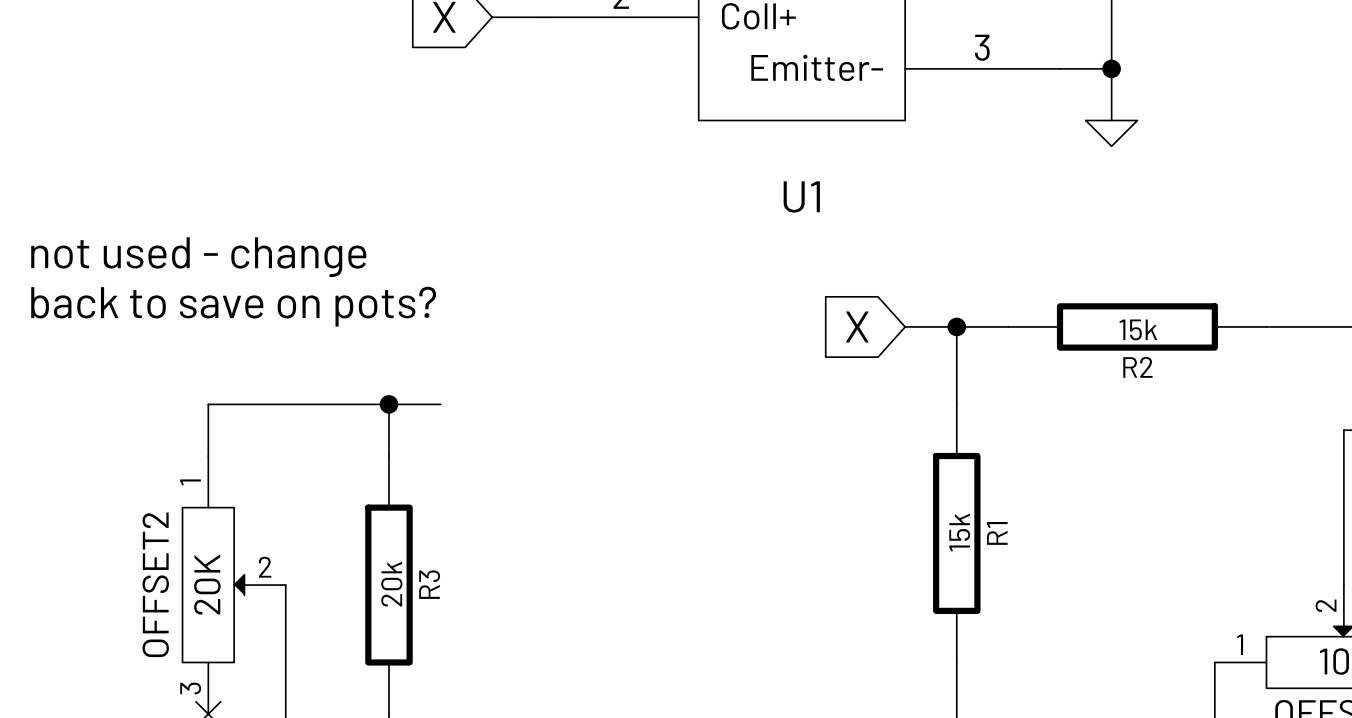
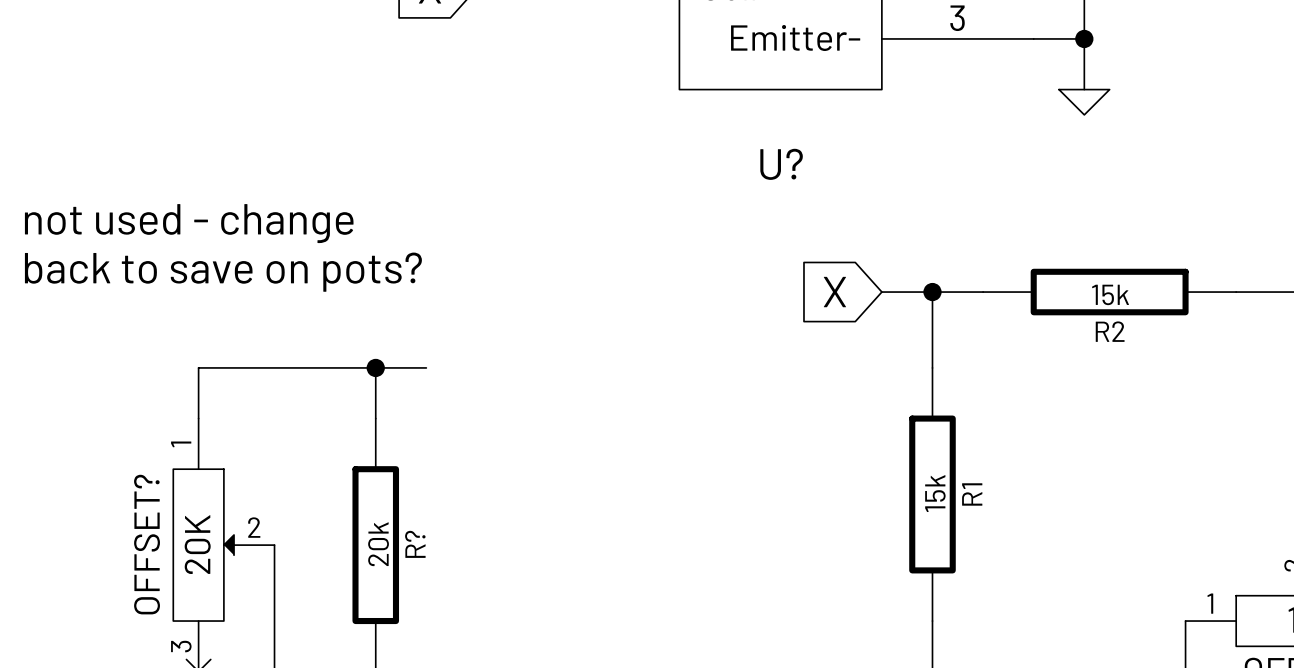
U1 name: U1 (801, 196) -> U? (781, 164)
OFFSET2 name: OFFSET2 (155, 584) -> OFFSET? (147, 544)
R3 name: R3 (429, 584) -> R? (415, 544)

